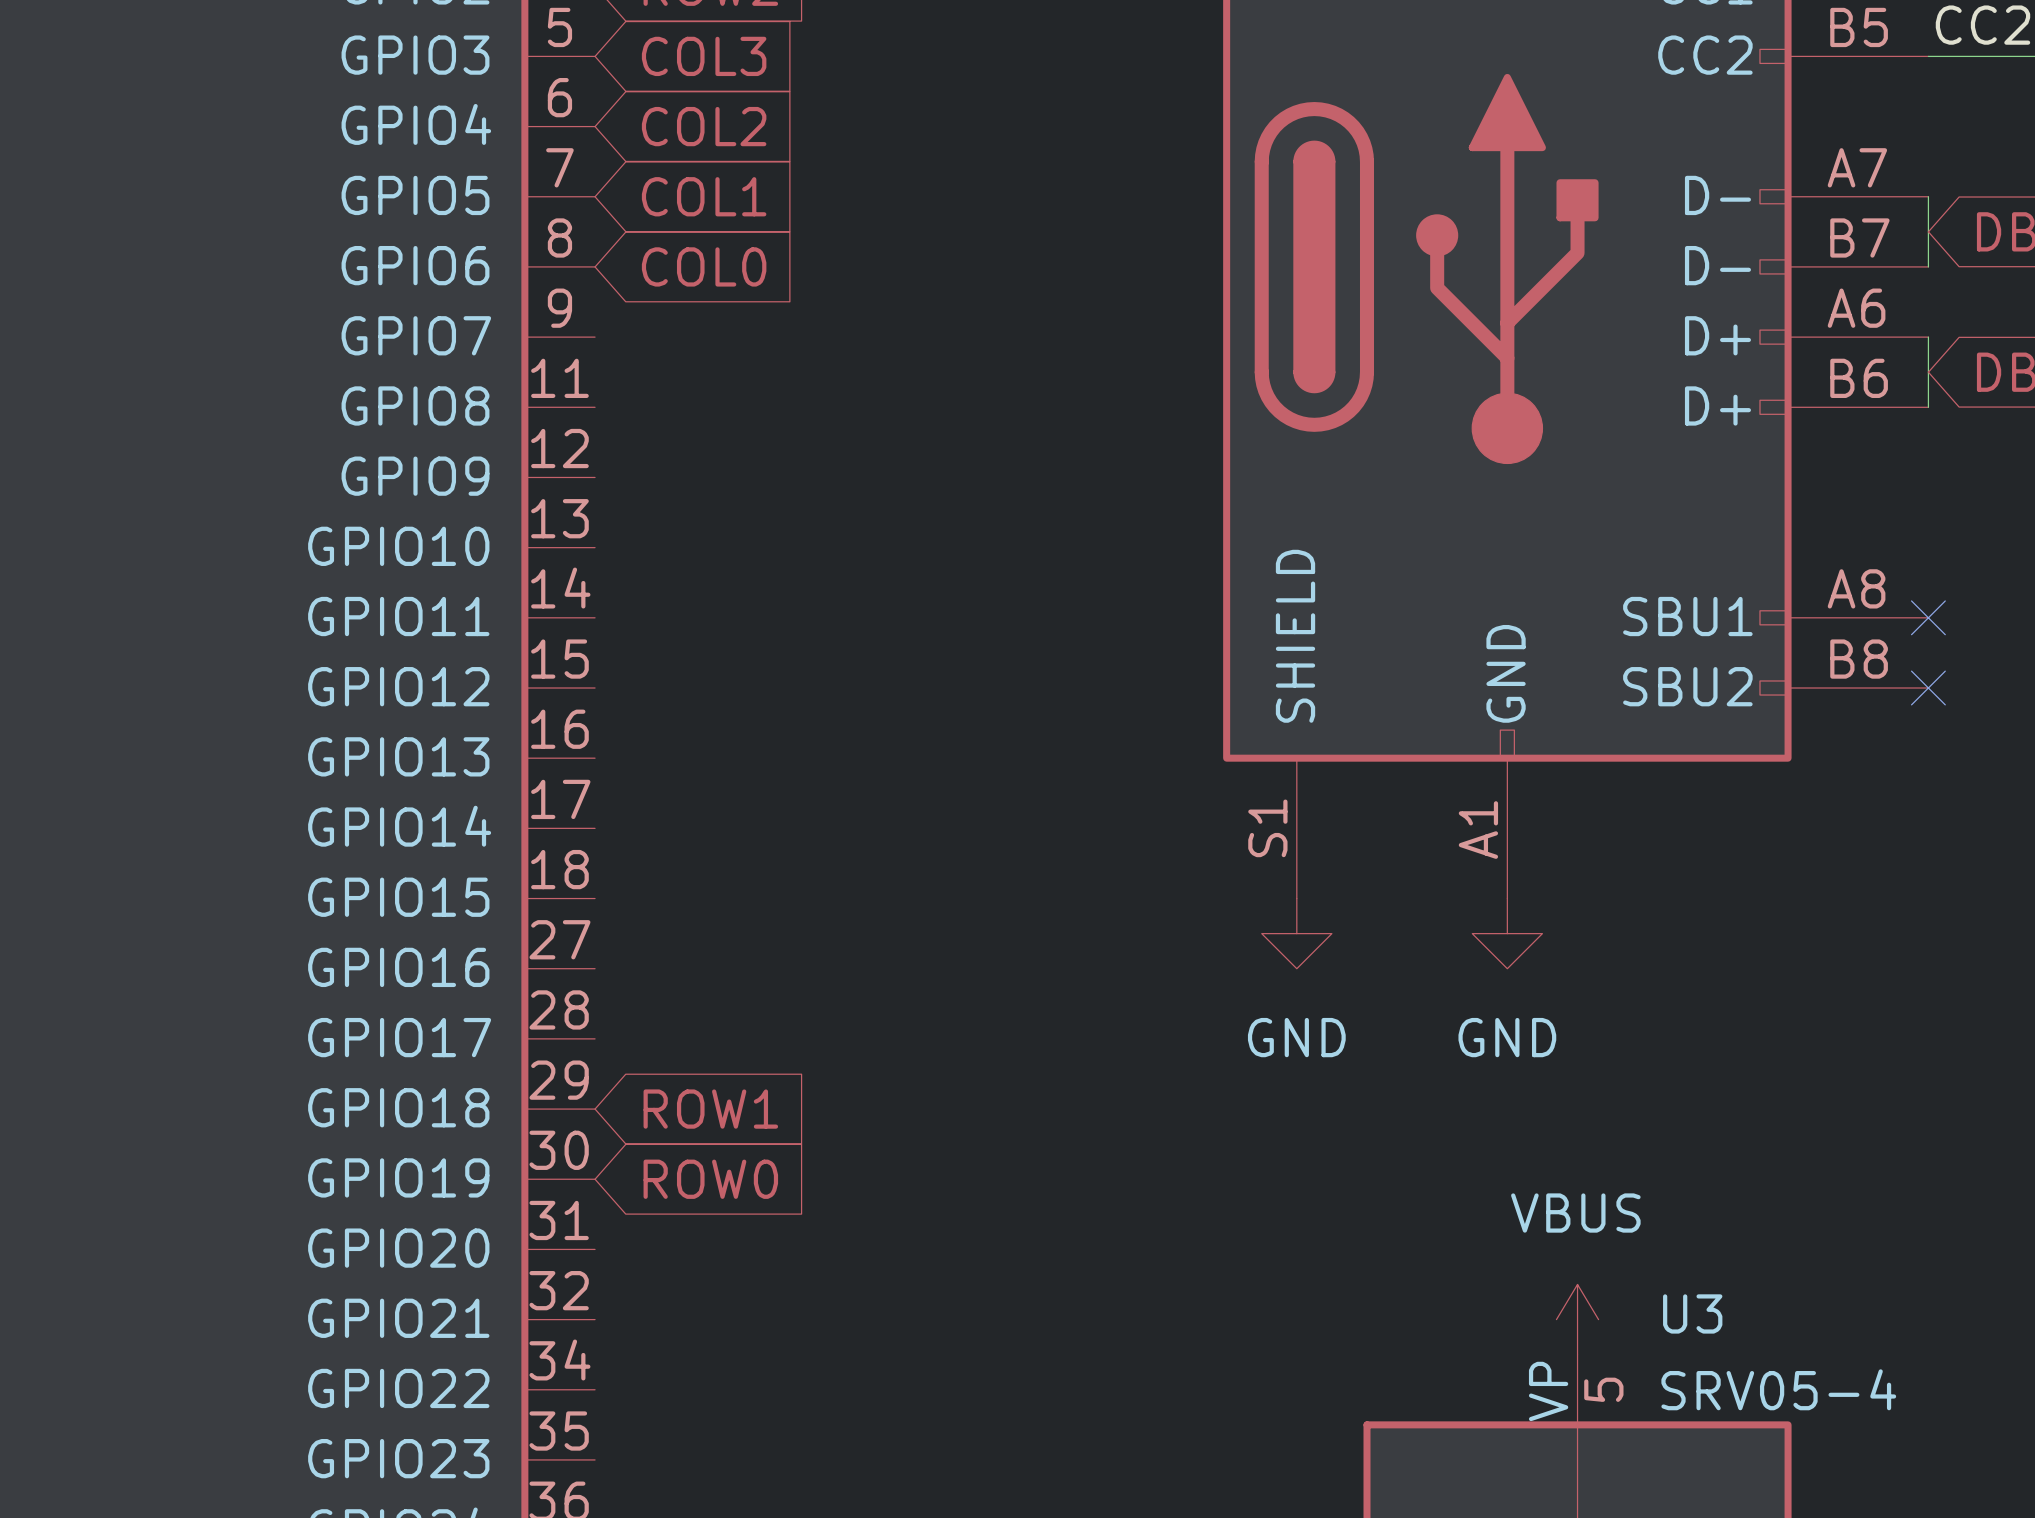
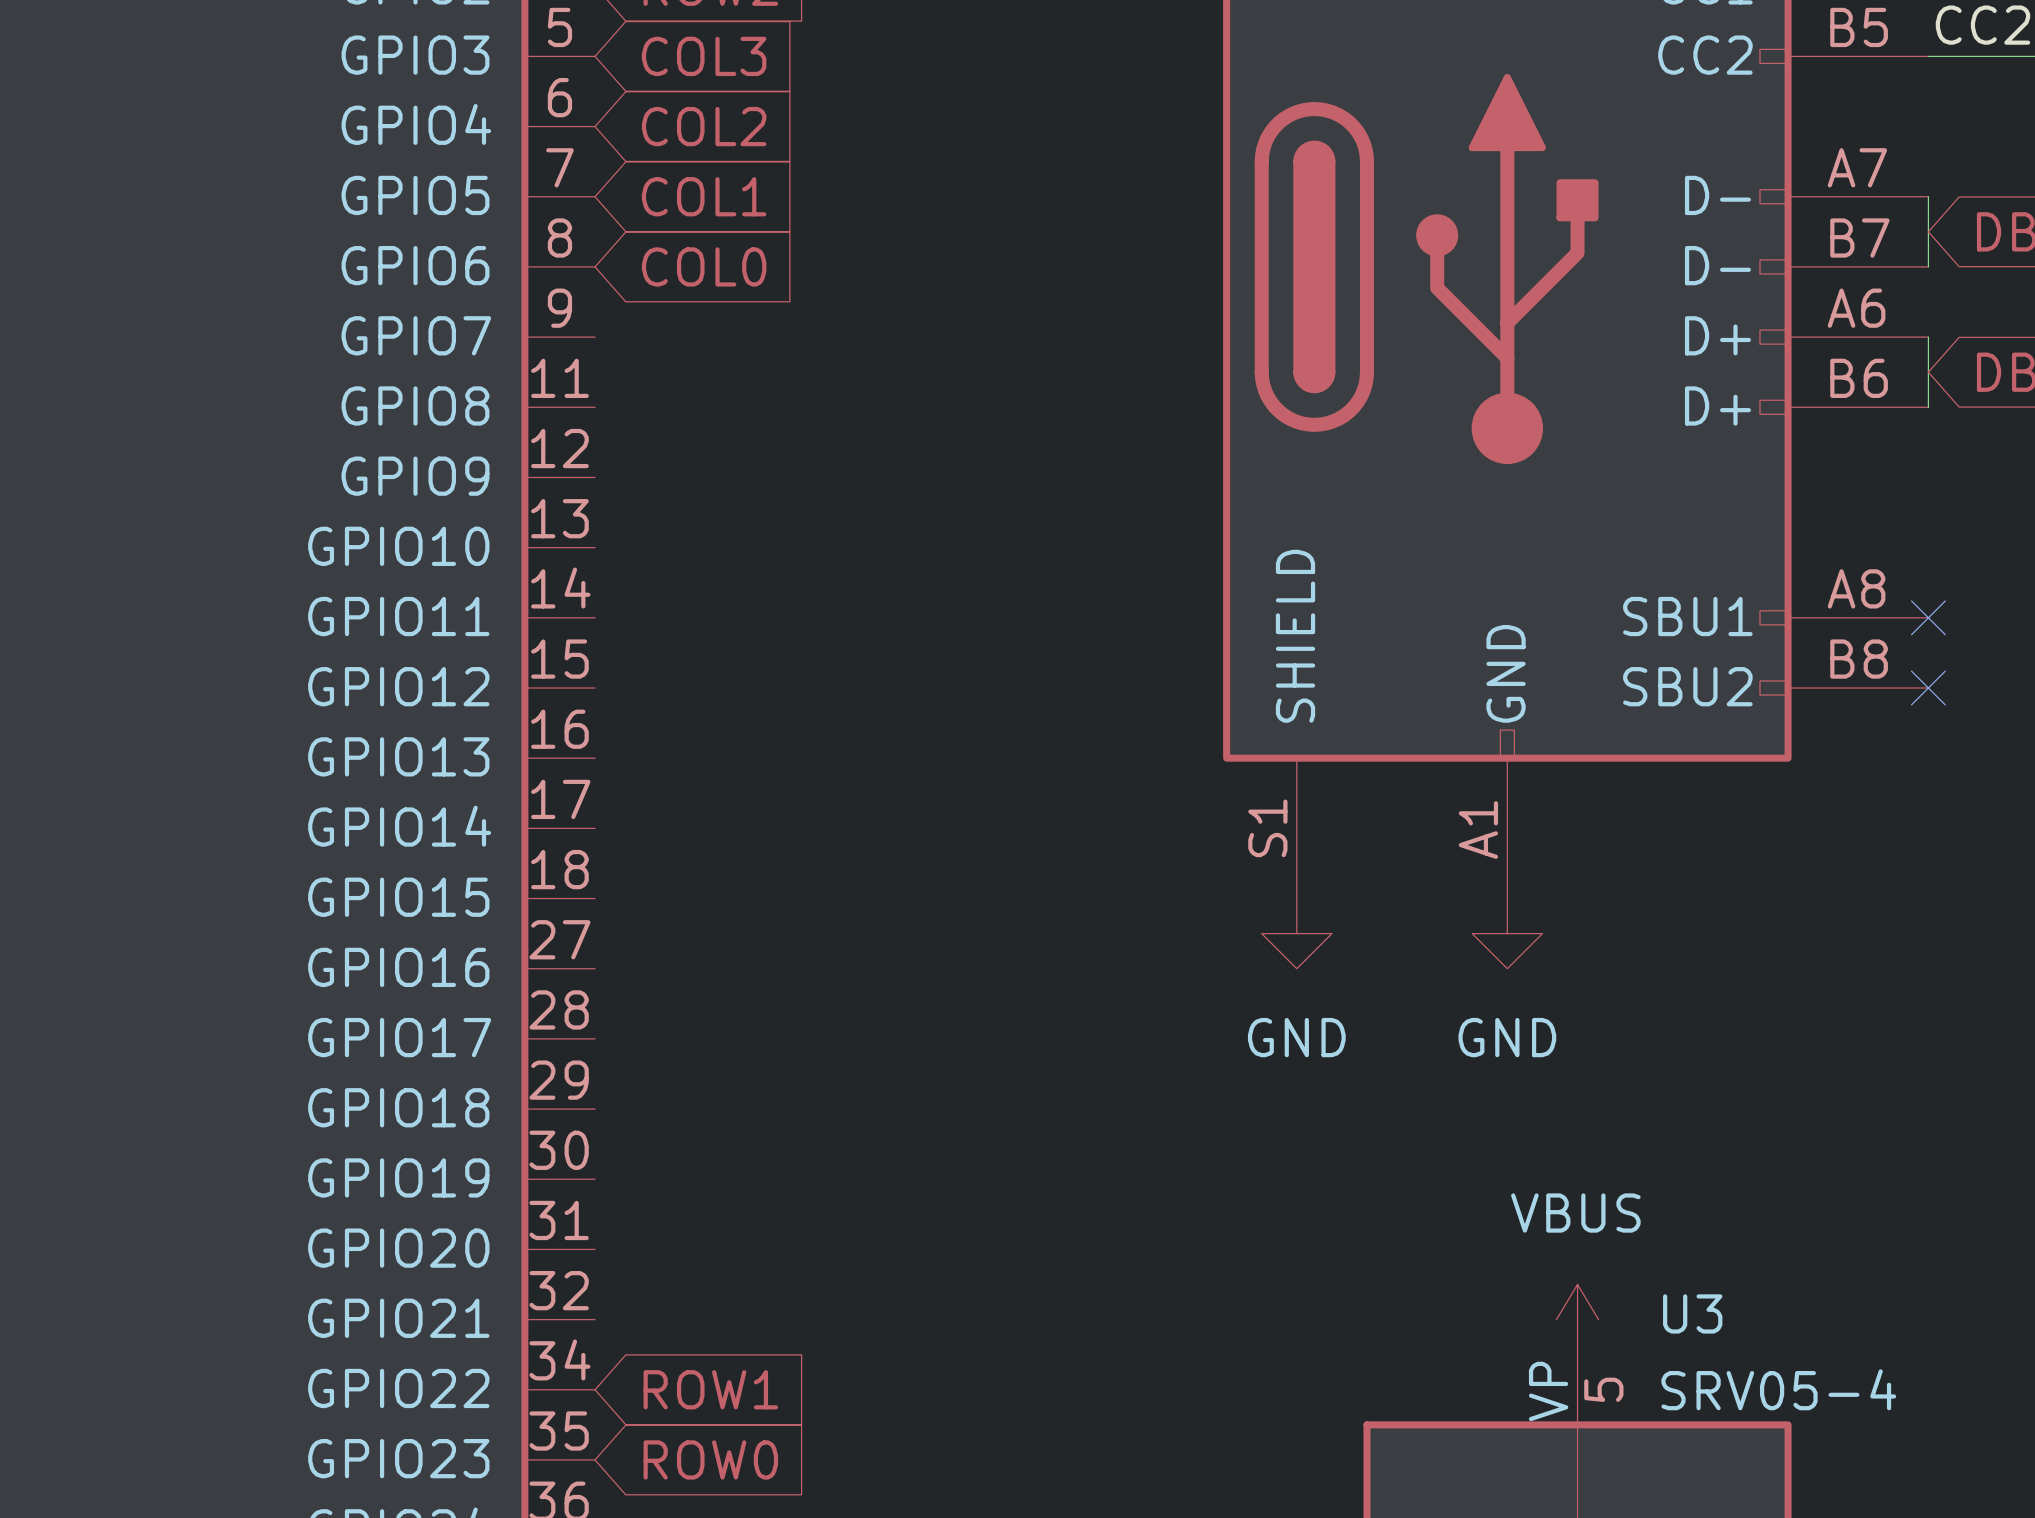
global label position: ROW1 (710, 1109) -> ROW1 (710, 1389)
global label position: ROW0 (710, 1179) -> ROW0 (710, 1459)

